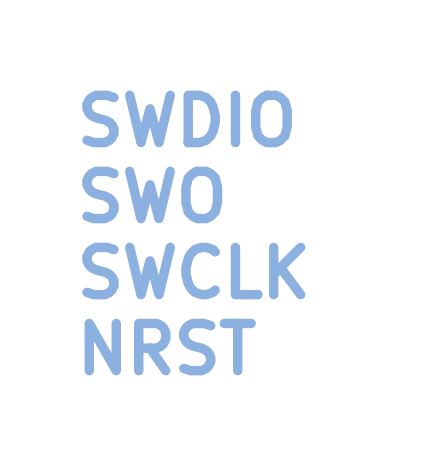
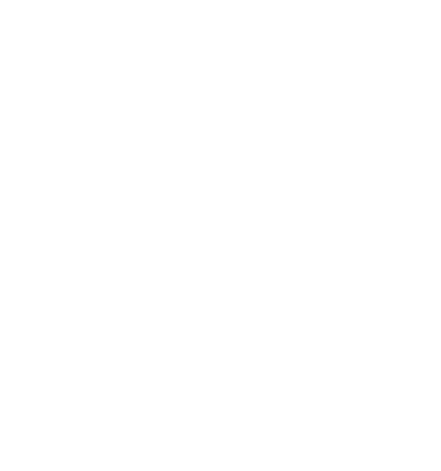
text: SWDIO (187, 118) -> none
text: SWO (152, 194) -> none
text: SWCLK (193, 271) -> none
text: NRST (170, 347) -> none

